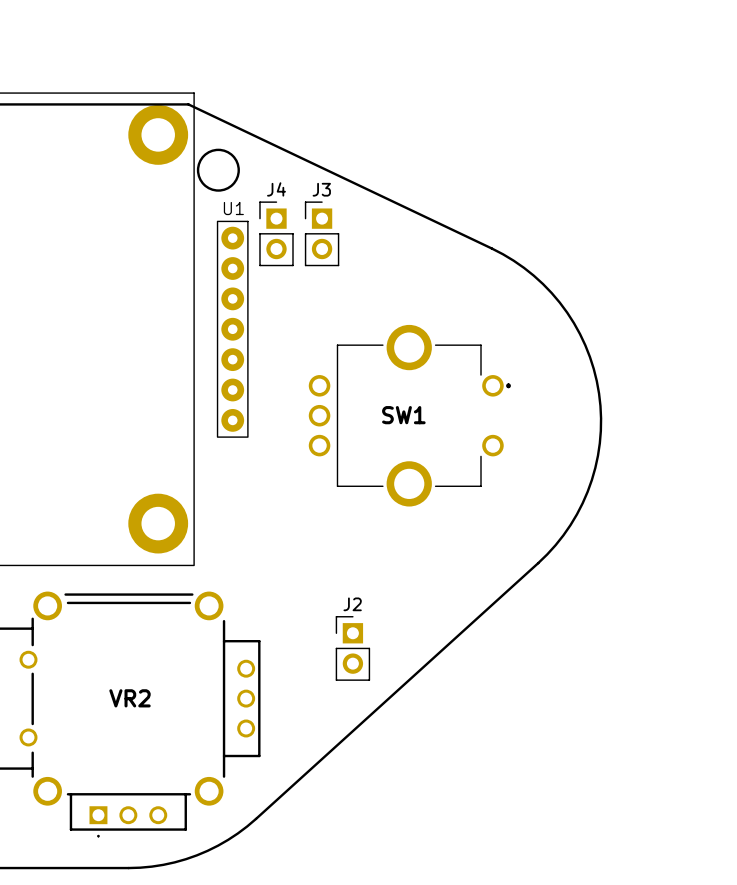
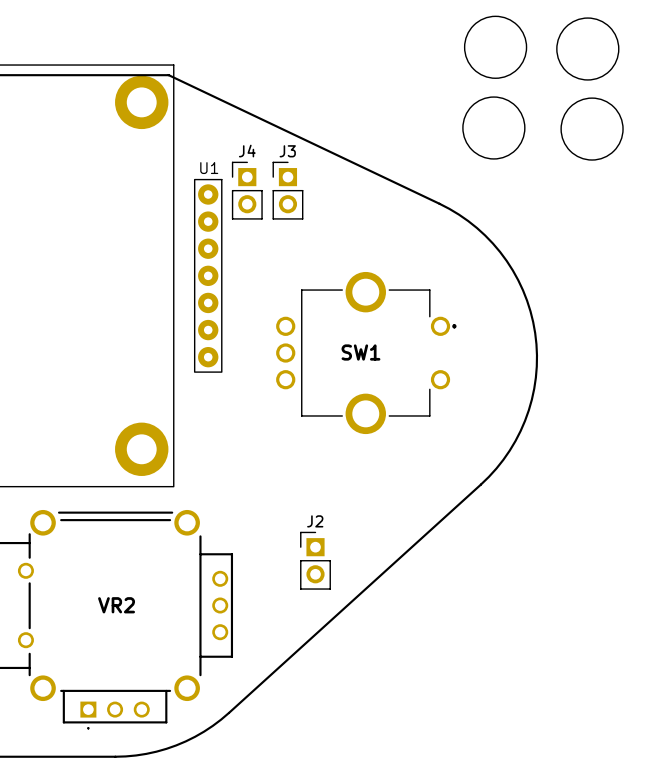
drawing: none -> [464, 15, 528, 79]
drawing: none -> [556, 17, 620, 81]
drawing: none -> [462, 96, 526, 160]
drawing: none -> [560, 97, 624, 161]
round board edge: [196, 148, 240, 192] -> none

